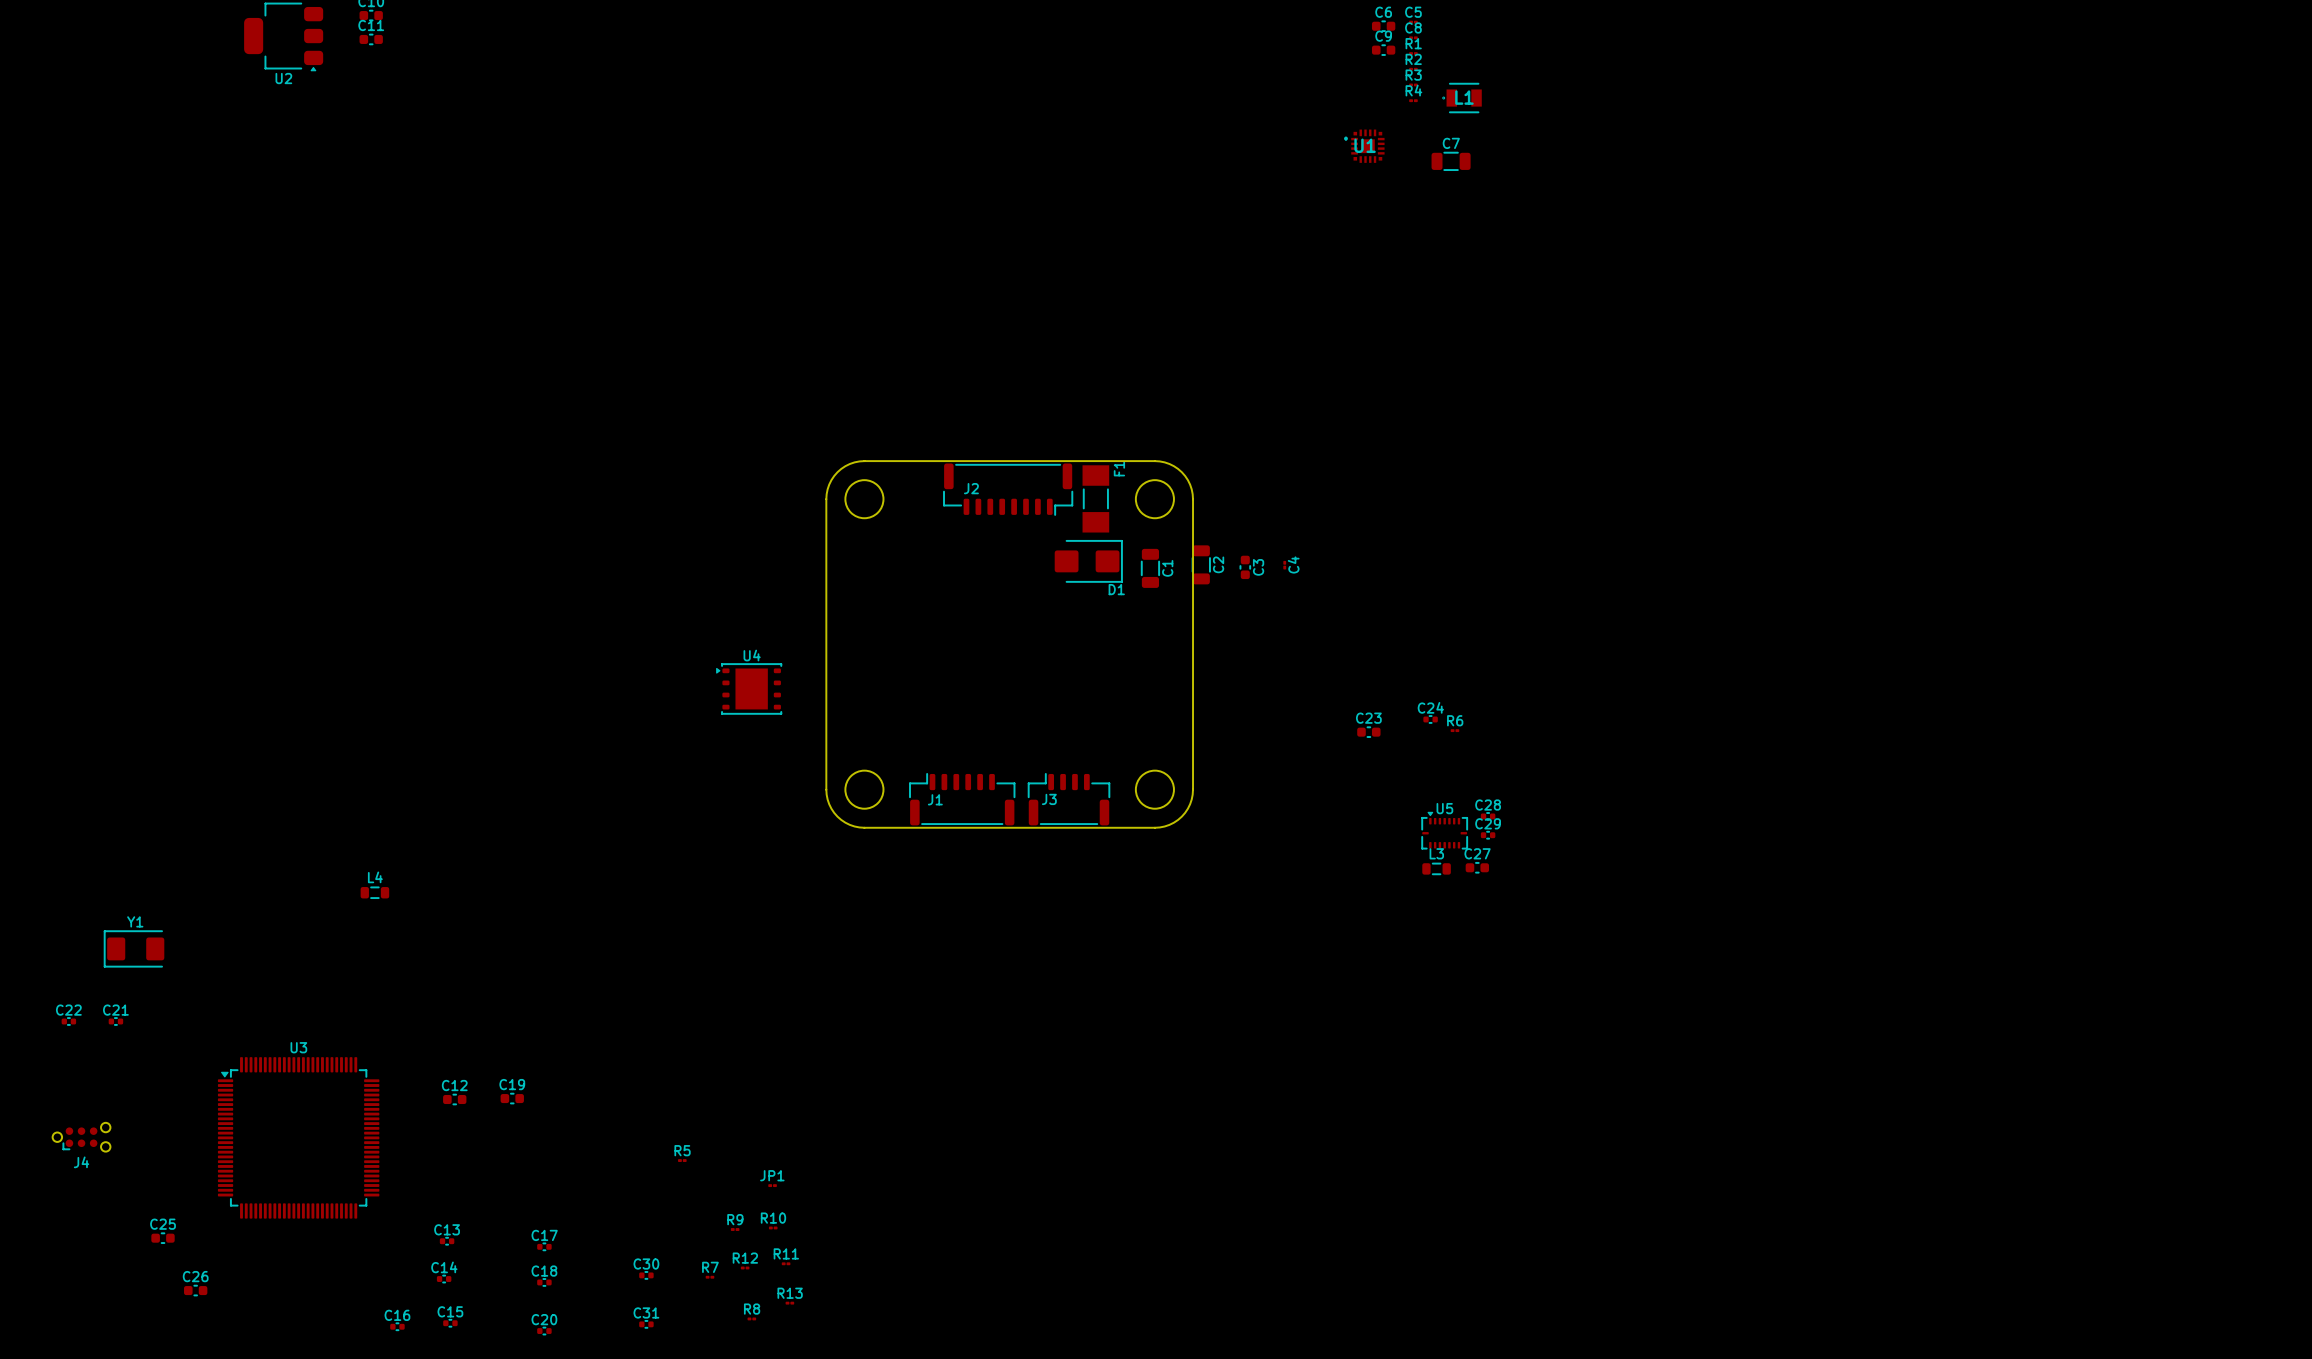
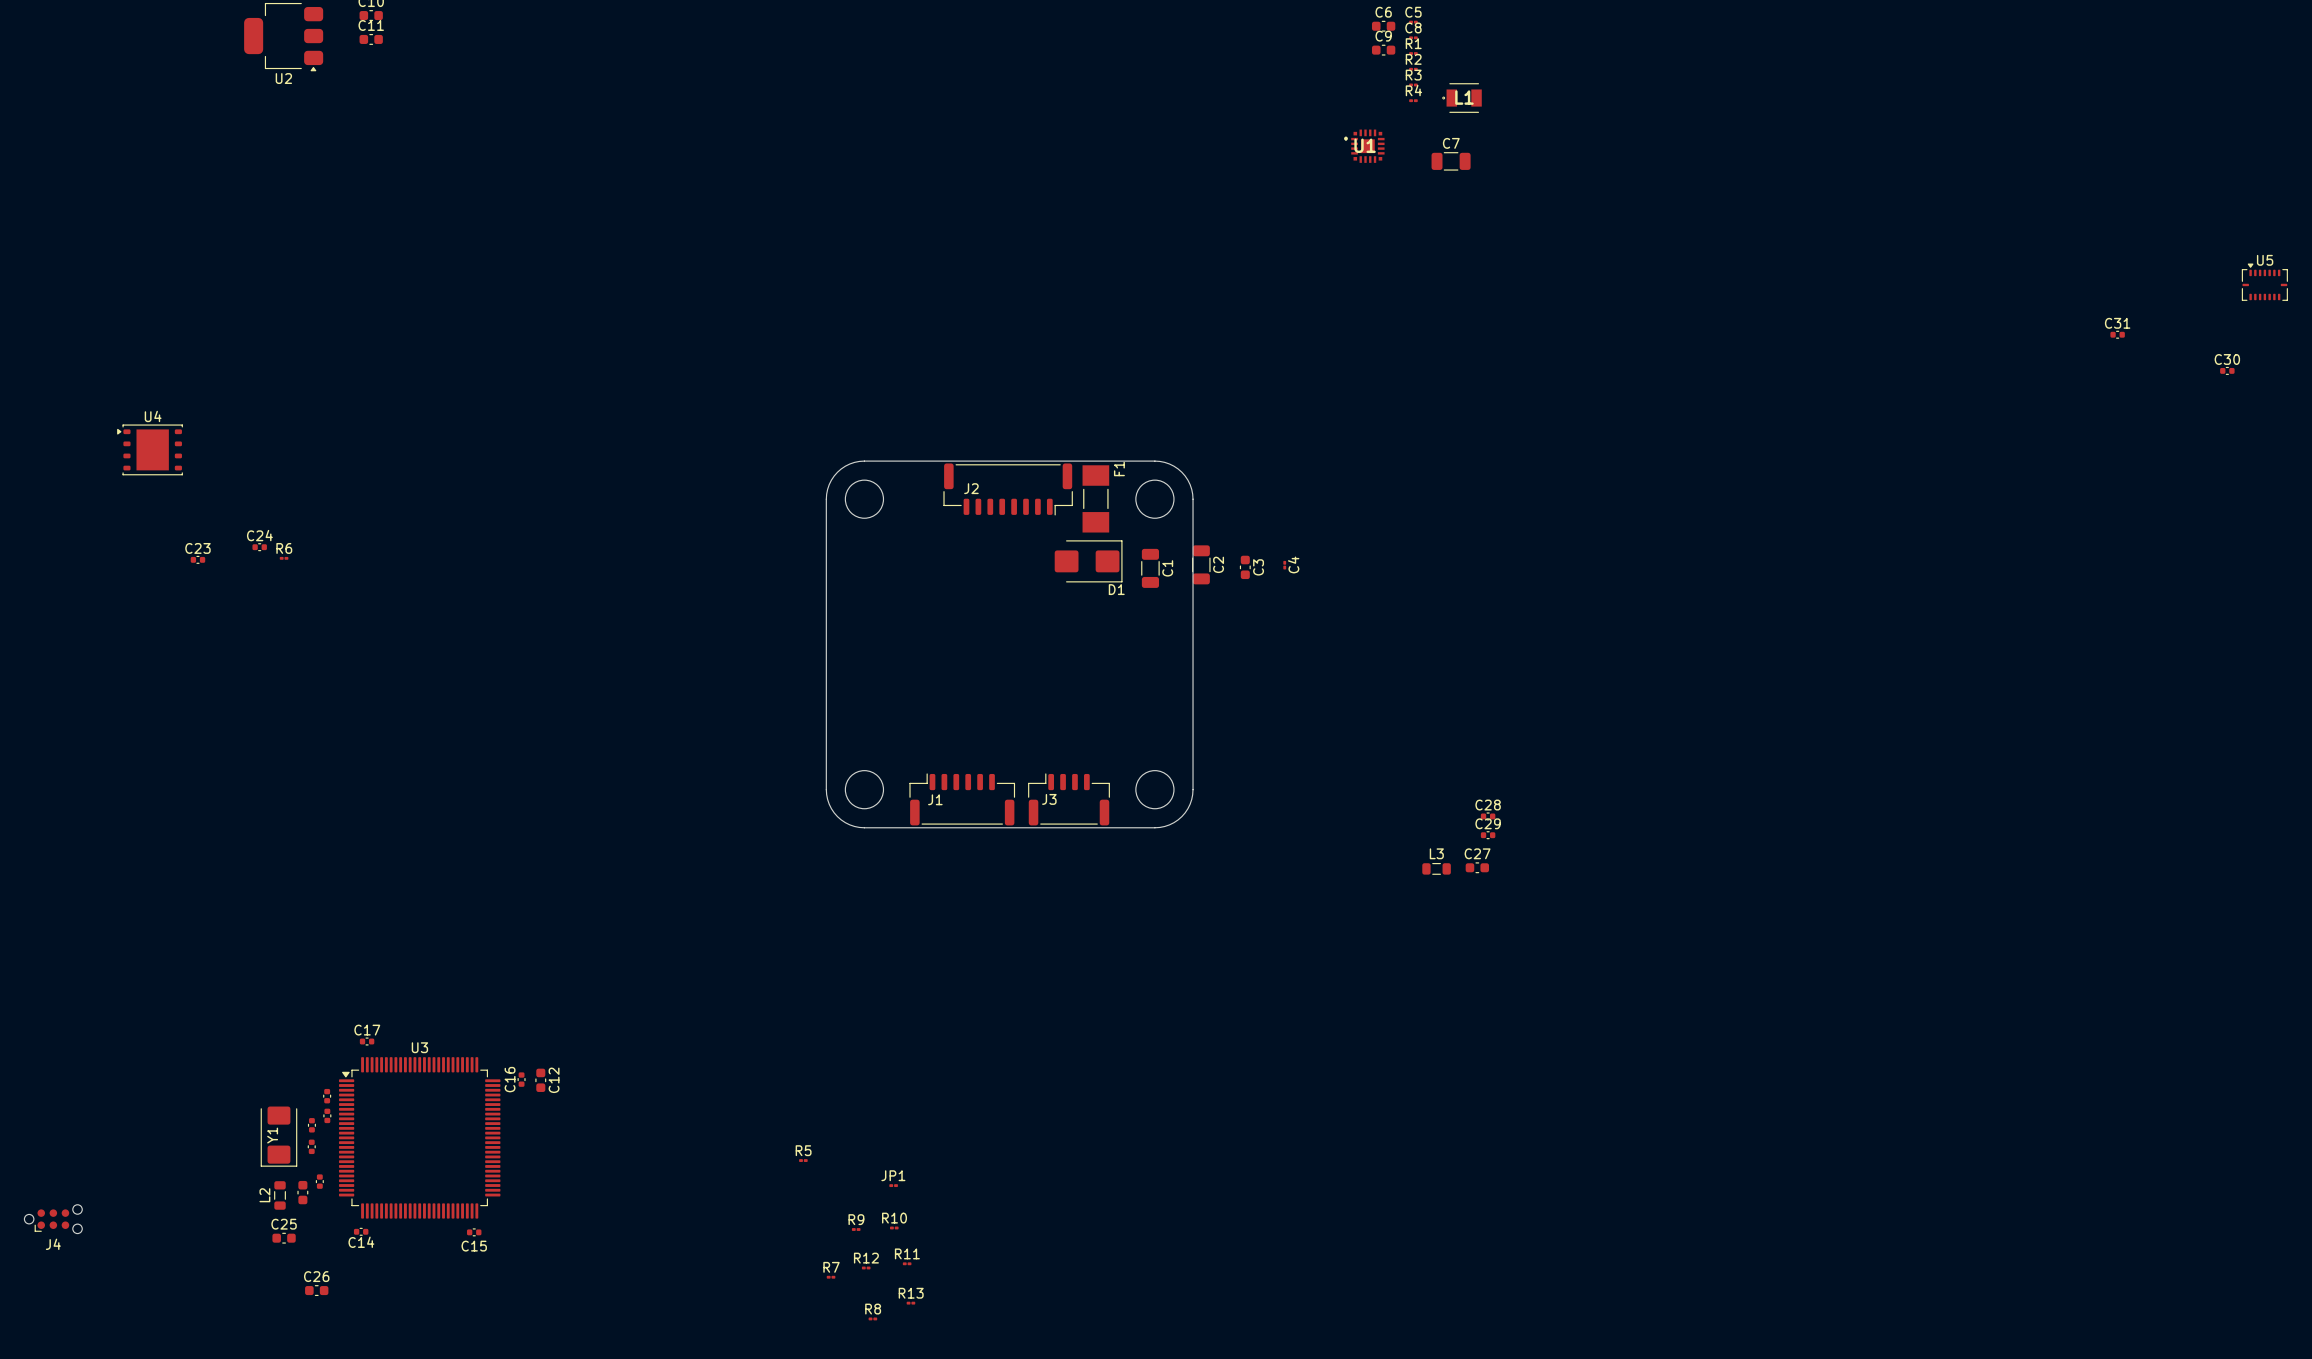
U4 position: (748, 688) -> (150, 449)
C24 position: (1430, 719) -> (259, 547)
C23 footprint: [1357, 726, 1381, 738] -> [190, 555, 206, 564]
R6 position: (1454, 730) -> (284, 558)
U5 position: (1444, 830) -> (2264, 282)
L4: (374, 892) -> none
Y1 name position: Y1 (135, 921) -> Y1 (272, 1135)
Y1 rotation: 0° (134, 948) -> 90° counterclockwise (278, 1136)
Y1 position: (134, 948) -> (278, 1136)
C22: (68, 1021) -> none
C21: (115, 1021) -> none
part: none -> (327, 1096)
C19: (512, 1098) -> none
C12 rotation: 0° (454, 1099) -> 90° clockwise (540, 1080)
C12 position: (454, 1099) -> (540, 1080)
part: none -> (327, 1115)
part: none -> (311, 1125)
J4 position: (81, 1137) -> (53, 1219)
U3 position: (298, 1137) -> (419, 1137)
part: none -> (311, 1146)
R5 position: (682, 1160) -> (803, 1160)
part: none -> (319, 1181)
JP1 position: (772, 1185) -> (893, 1185)
part: none -> (302, 1192)
L2: none -> (280, 1195)
R10 position: (773, 1227) -> (894, 1227)
R9 position: (735, 1229) -> (856, 1229)
C25 position: (163, 1238) -> (284, 1238)
C13: (447, 1241) -> none
C17 position: (544, 1246) -> (367, 1041)
R11 position: (786, 1263) -> (907, 1263)
C14 name position: C14 (444, 1267) -> C14 (361, 1242)
R12 position: (745, 1267) -> (866, 1267)
C30 position: (646, 1275) -> (2227, 370)
R7 position: (709, 1277) -> (831, 1277)
C14 position: (444, 1279) -> (361, 1231)
C18: (544, 1282) -> none
C26 position: (195, 1290) -> (316, 1290)
R13 position: (789, 1303) -> (910, 1303)
C15 name position: C15 (450, 1311) -> C15 (474, 1246)
R8 position: (751, 1318) -> (872, 1318)
C15 position: (450, 1323) -> (474, 1232)
C31 position: (646, 1324) -> (2117, 334)
C16 rotation: 0° (397, 1326) -> 90° clockwise (521, 1079)
C16 position: (397, 1326) -> (521, 1079)
C20: (544, 1331) -> none

